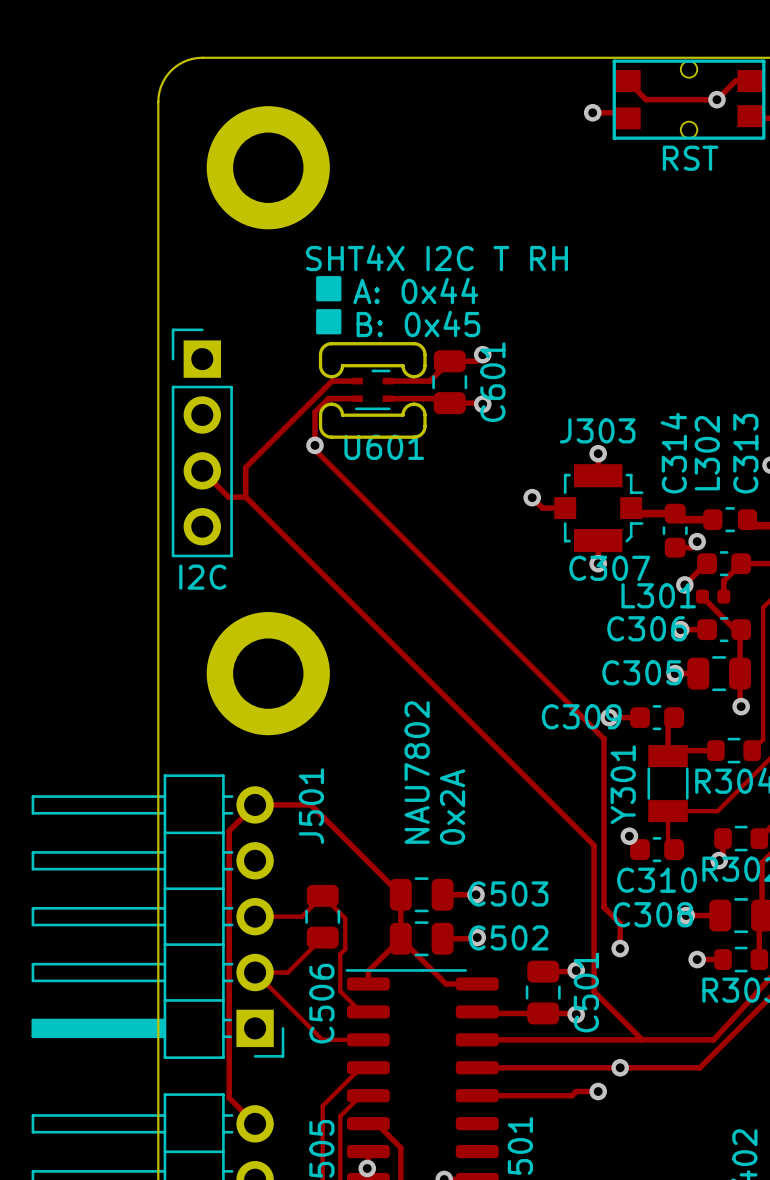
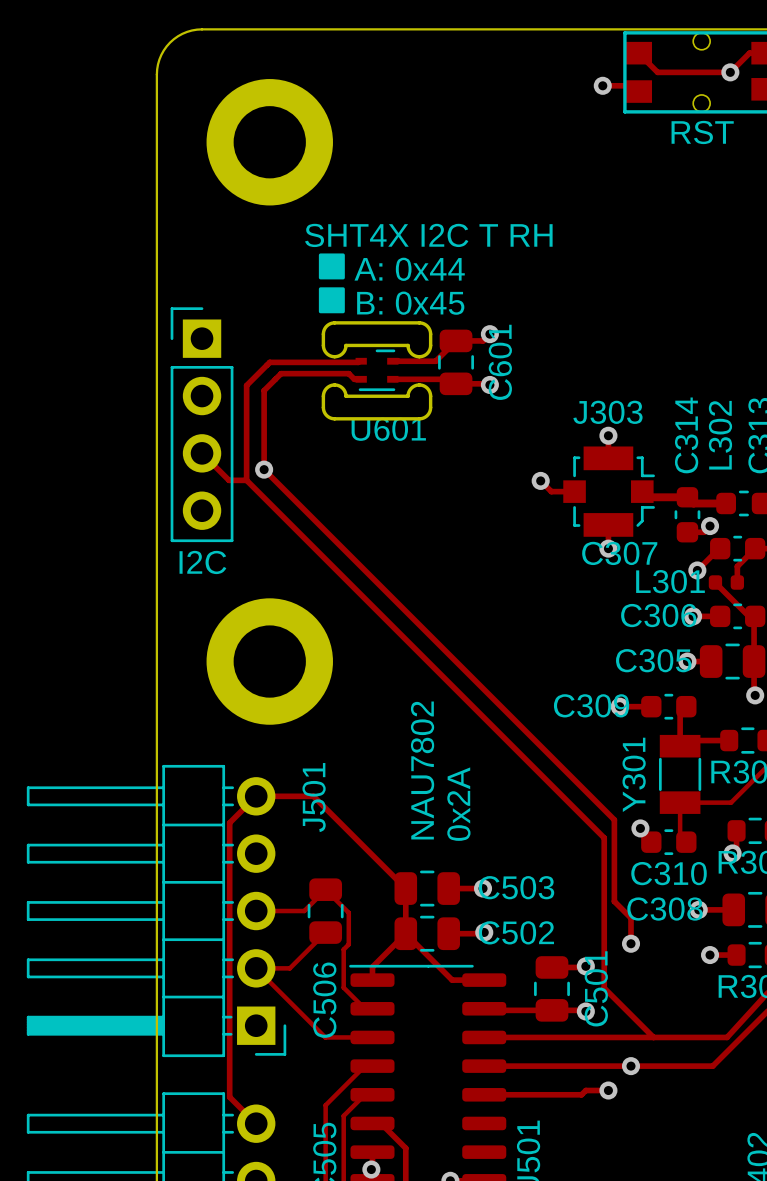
track: (355, 381) (332, 381) (245, 467) -> (359, 361) (269, 362) (246, 385) (246, 449)
track: (350, 398) (328, 398) (315, 412) (315, 449) (604, 738) (604, 827) -> (354, 379) (348, 373) (281, 373) (264, 390) (264, 469) (614, 819)
via position: (315, 445) -> (264, 469)

